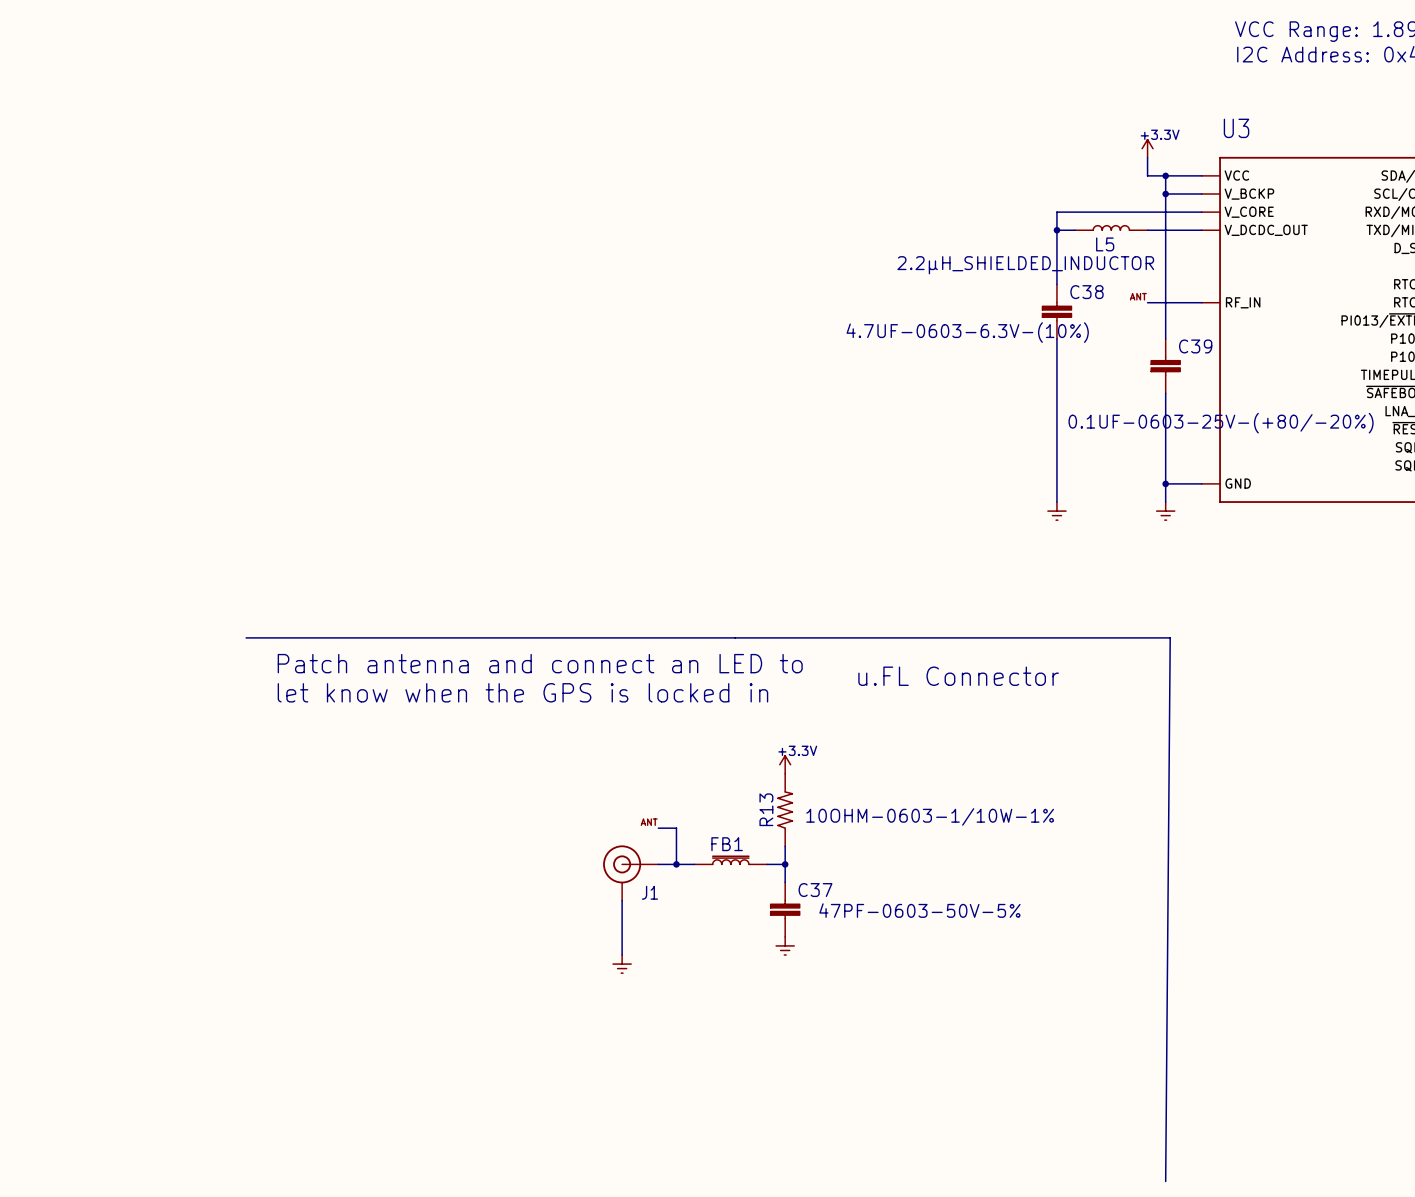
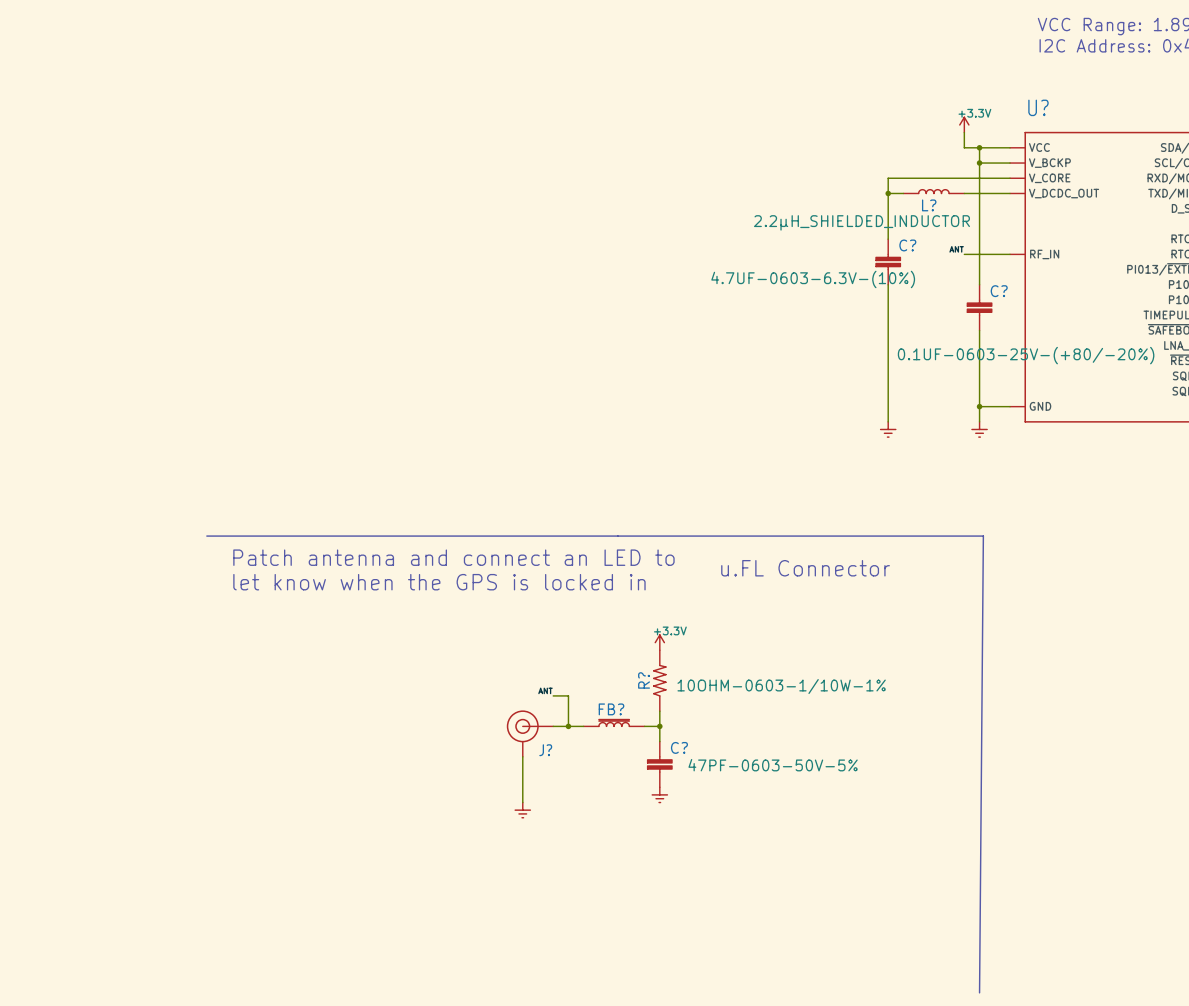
U3 name: U3 (1236, 128) -> U? (1038, 107)
L5 name: L5 (1105, 244) -> L? (929, 205)
C38 name: C38 (1086, 292) -> C? (907, 245)
C39 name: C39 (1195, 346) -> C? (999, 291)
R13 name: R13 (766, 809) -> R? (644, 680)
FB1 name: FB1 (727, 844) -> FB? (611, 709)
C37 name: C37 (815, 890) -> C? (679, 747)
J1 name: J1 (649, 892) -> J? (545, 750)

